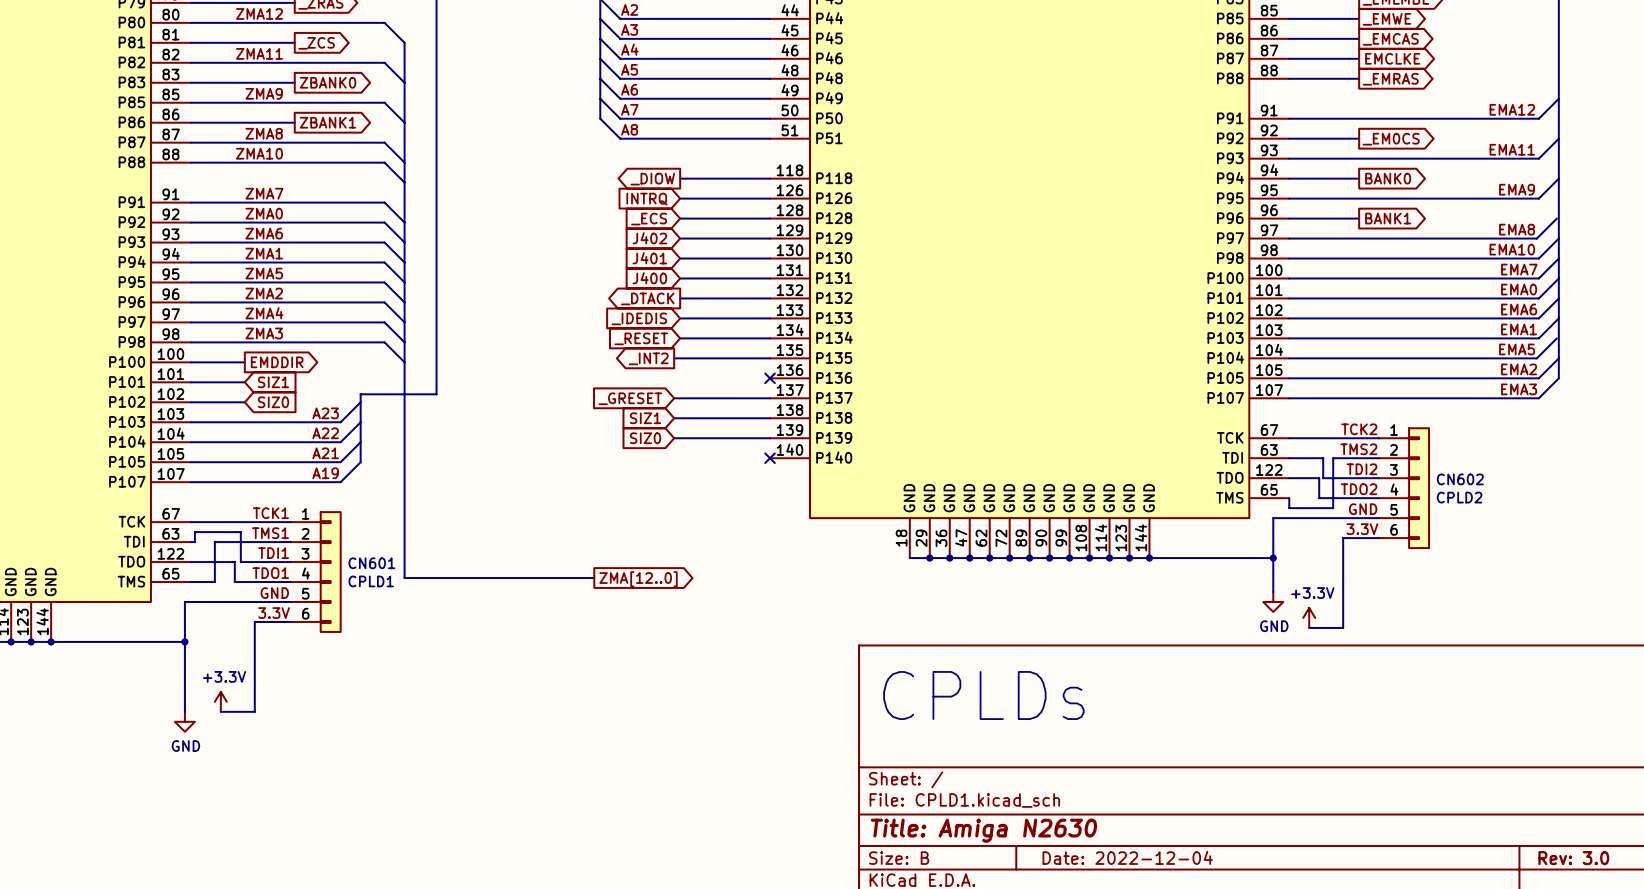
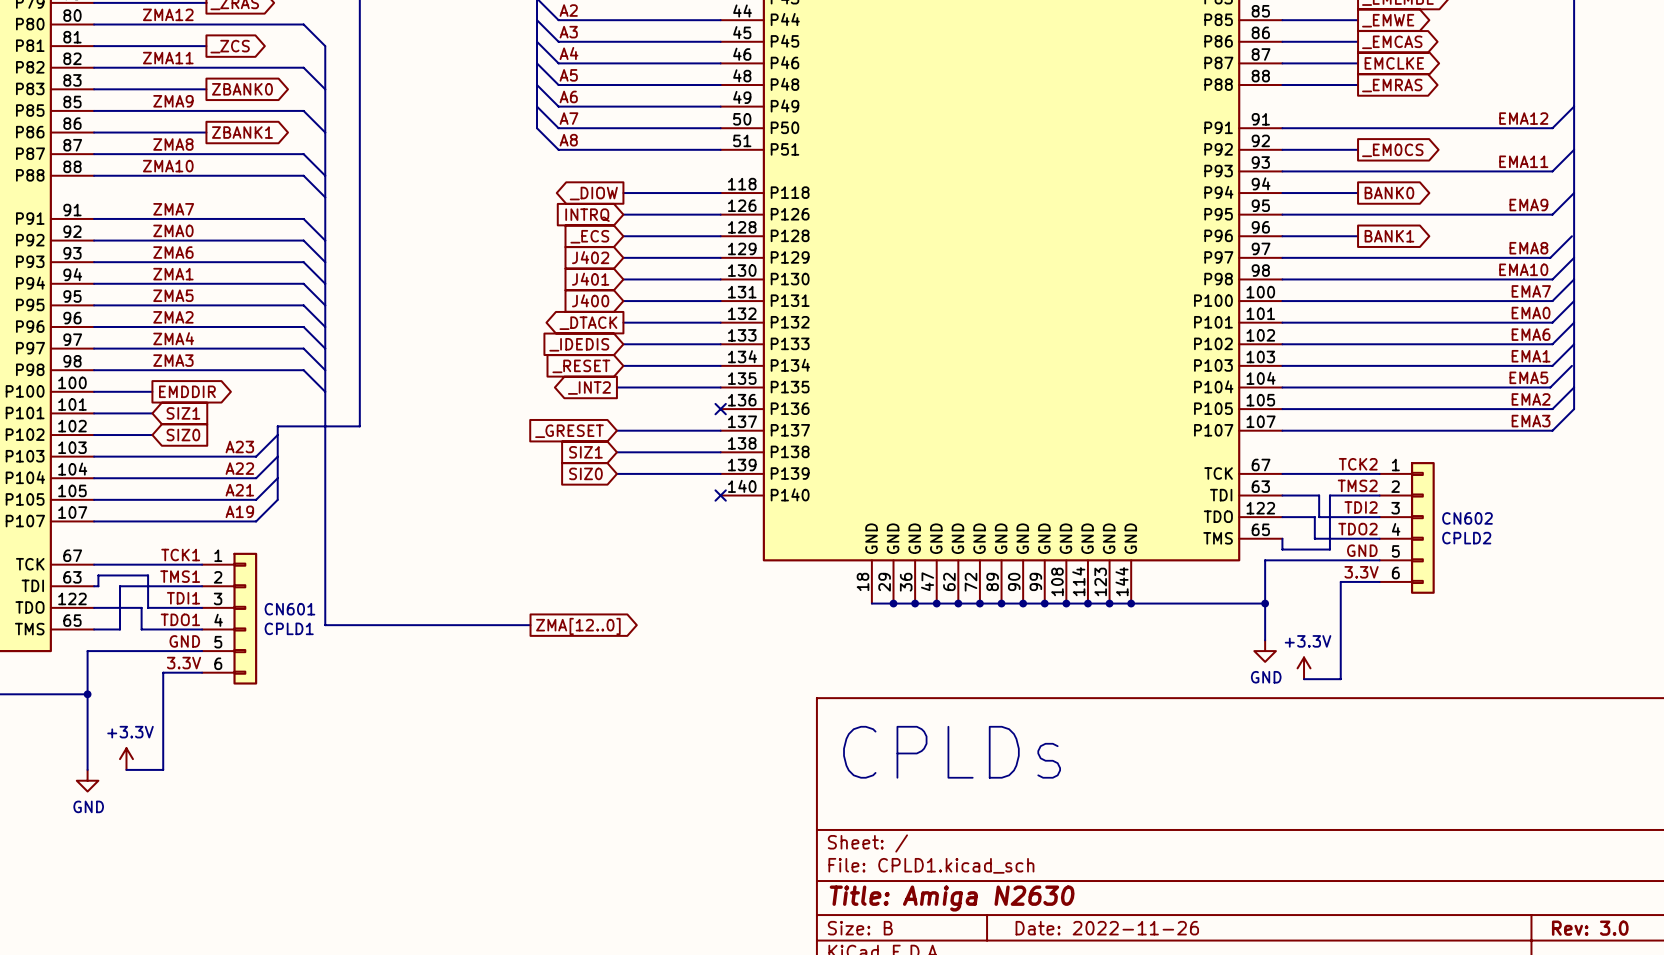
title block: Date: 2022-12-04 (1127, 857) -> Date: 2022-11-26 (1107, 928)

